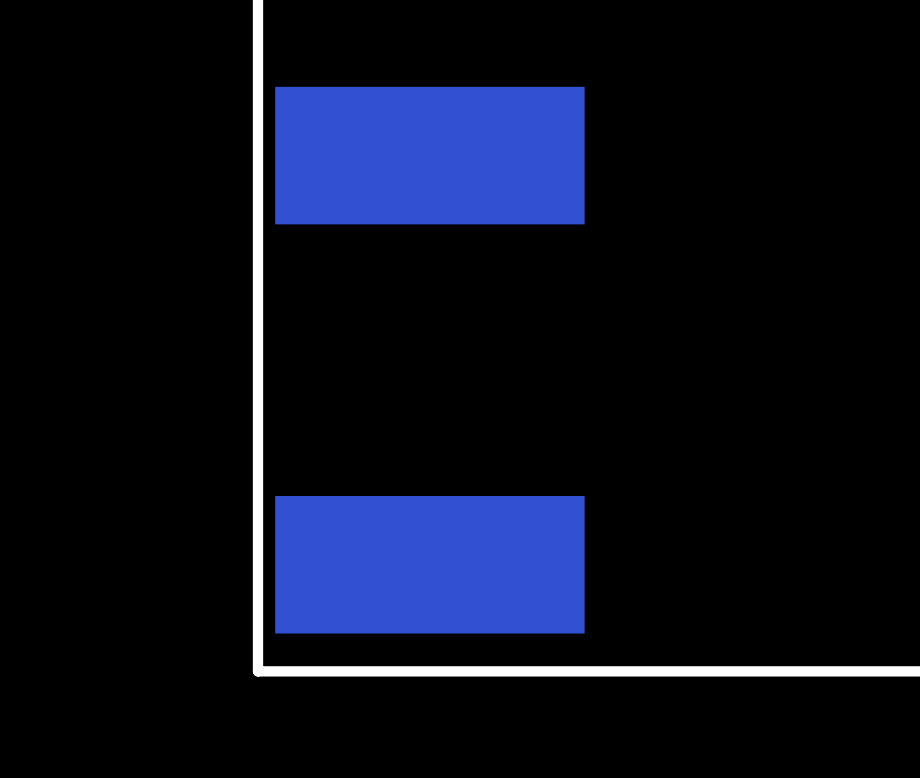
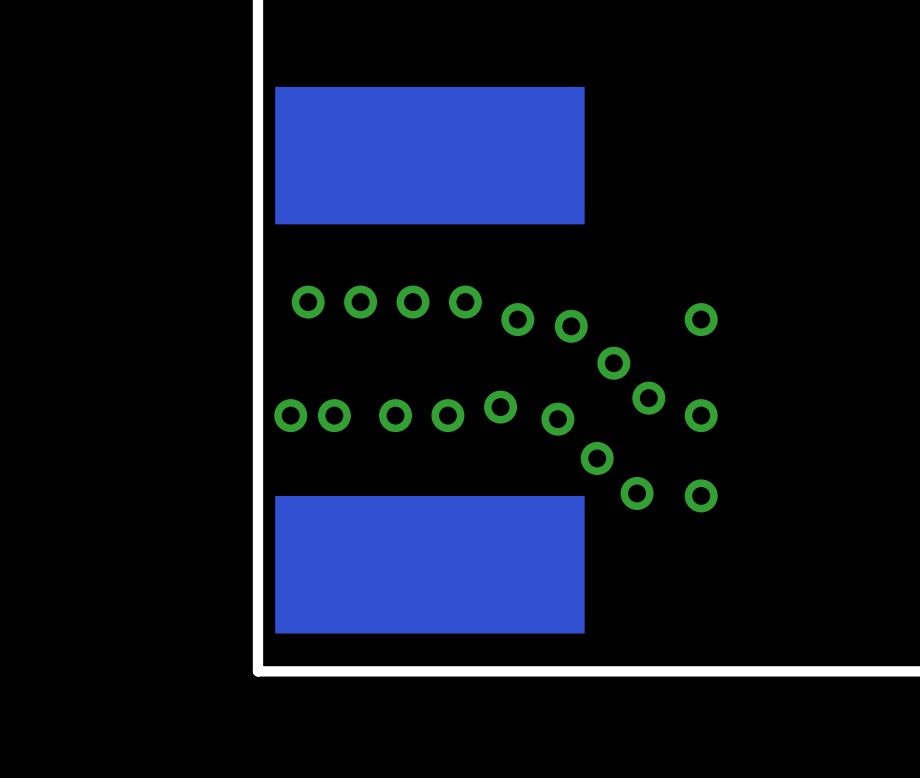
via: none -> (308, 302)
via: none -> (360, 302)
via: none -> (412, 302)
via: none -> (465, 302)
via: none -> (517, 319)
via: none -> (701, 319)
via: none -> (571, 326)
via: none -> (613, 363)
via: none -> (648, 398)
via: none -> (500, 407)
via: none -> (290, 415)
via: none -> (334, 415)
via: none -> (395, 415)
via: none -> (447, 415)
via: none -> (701, 415)
via: none -> (557, 419)
via: none -> (597, 458)
via: none -> (637, 493)
via: none -> (701, 495)

